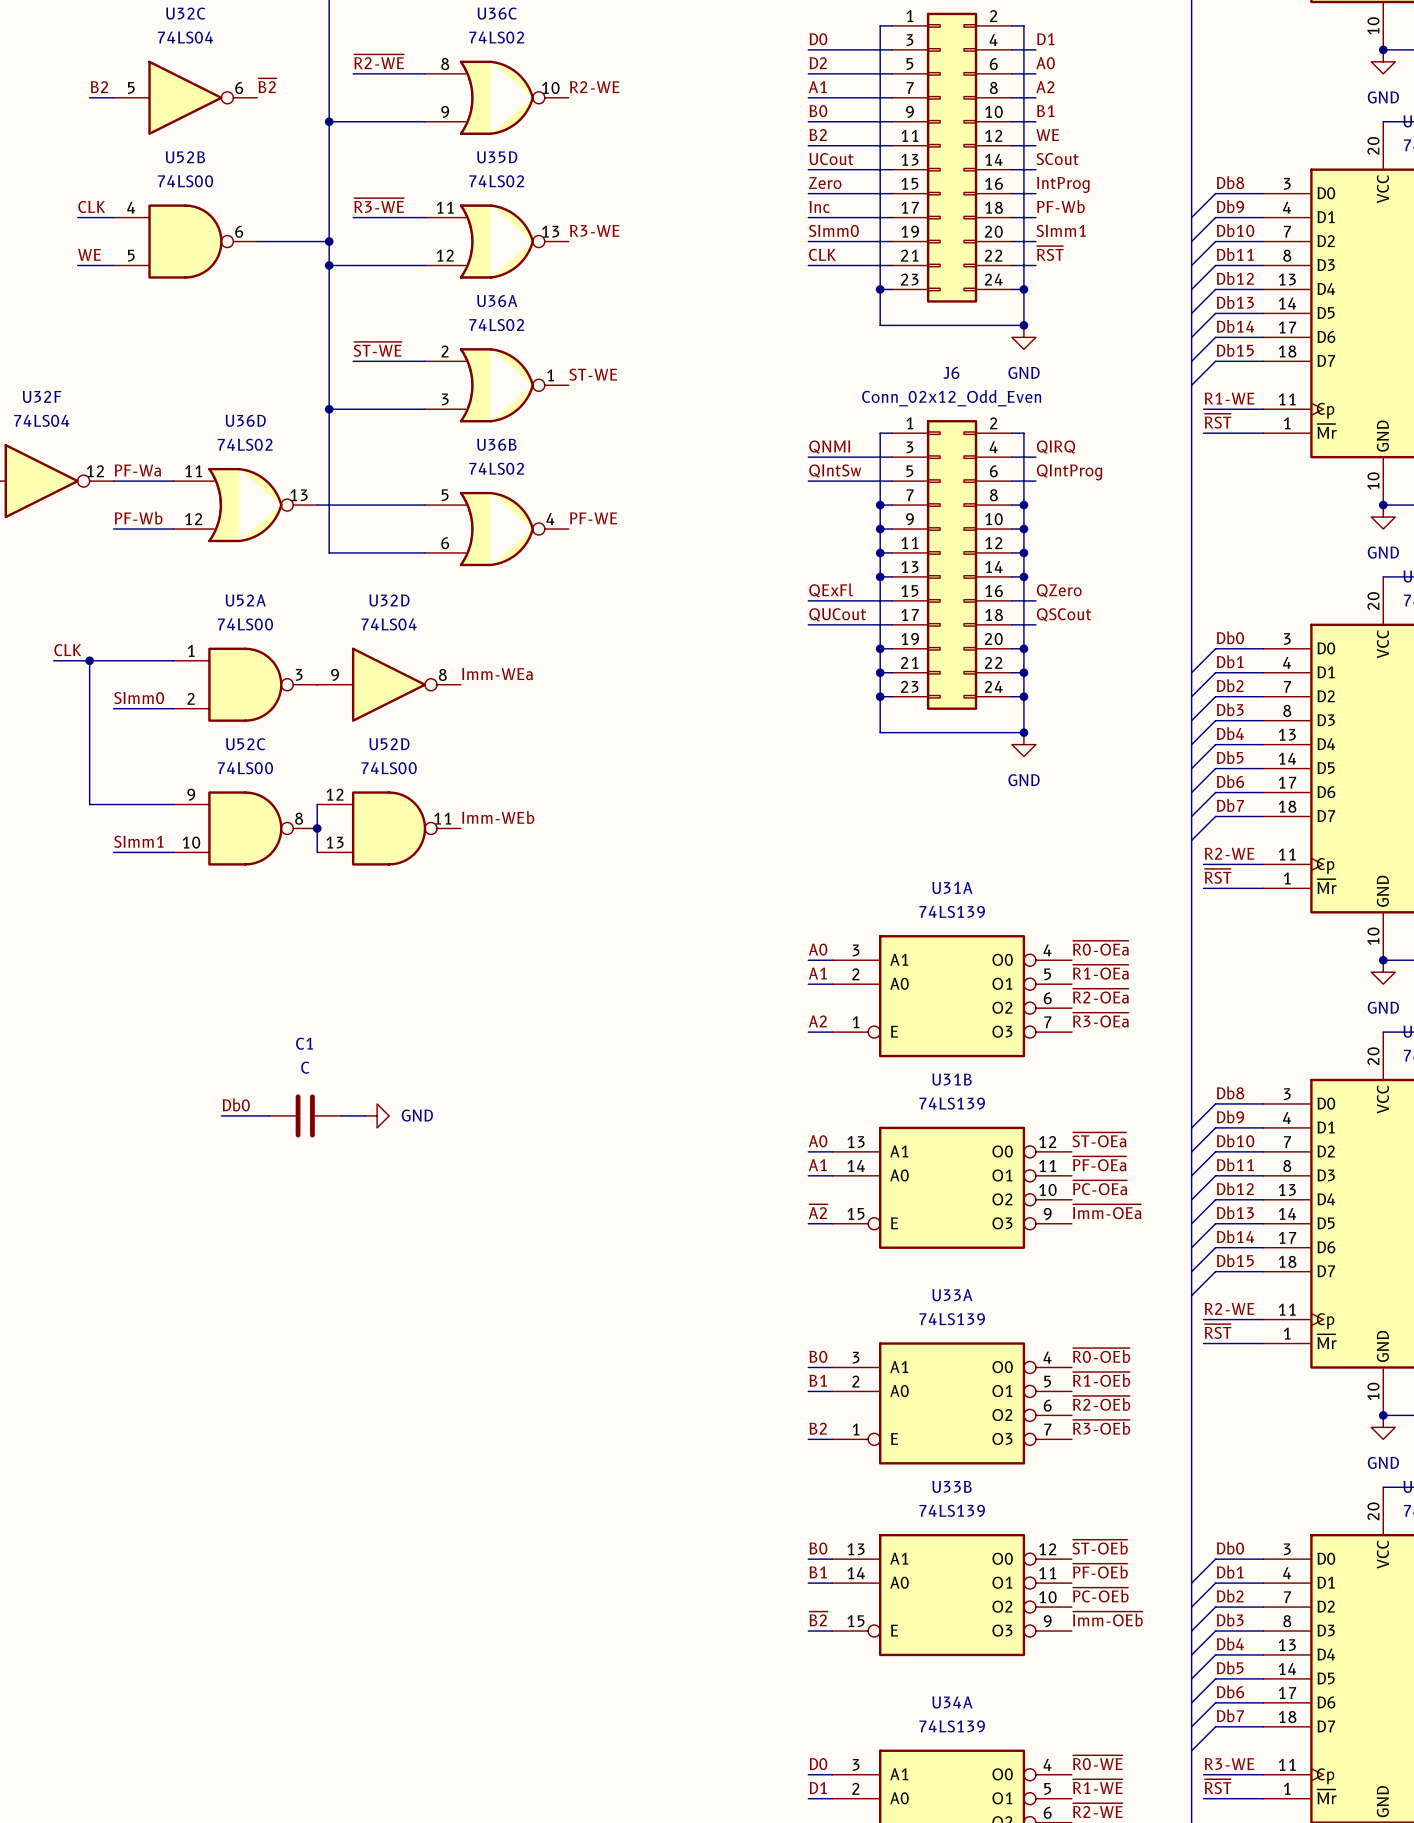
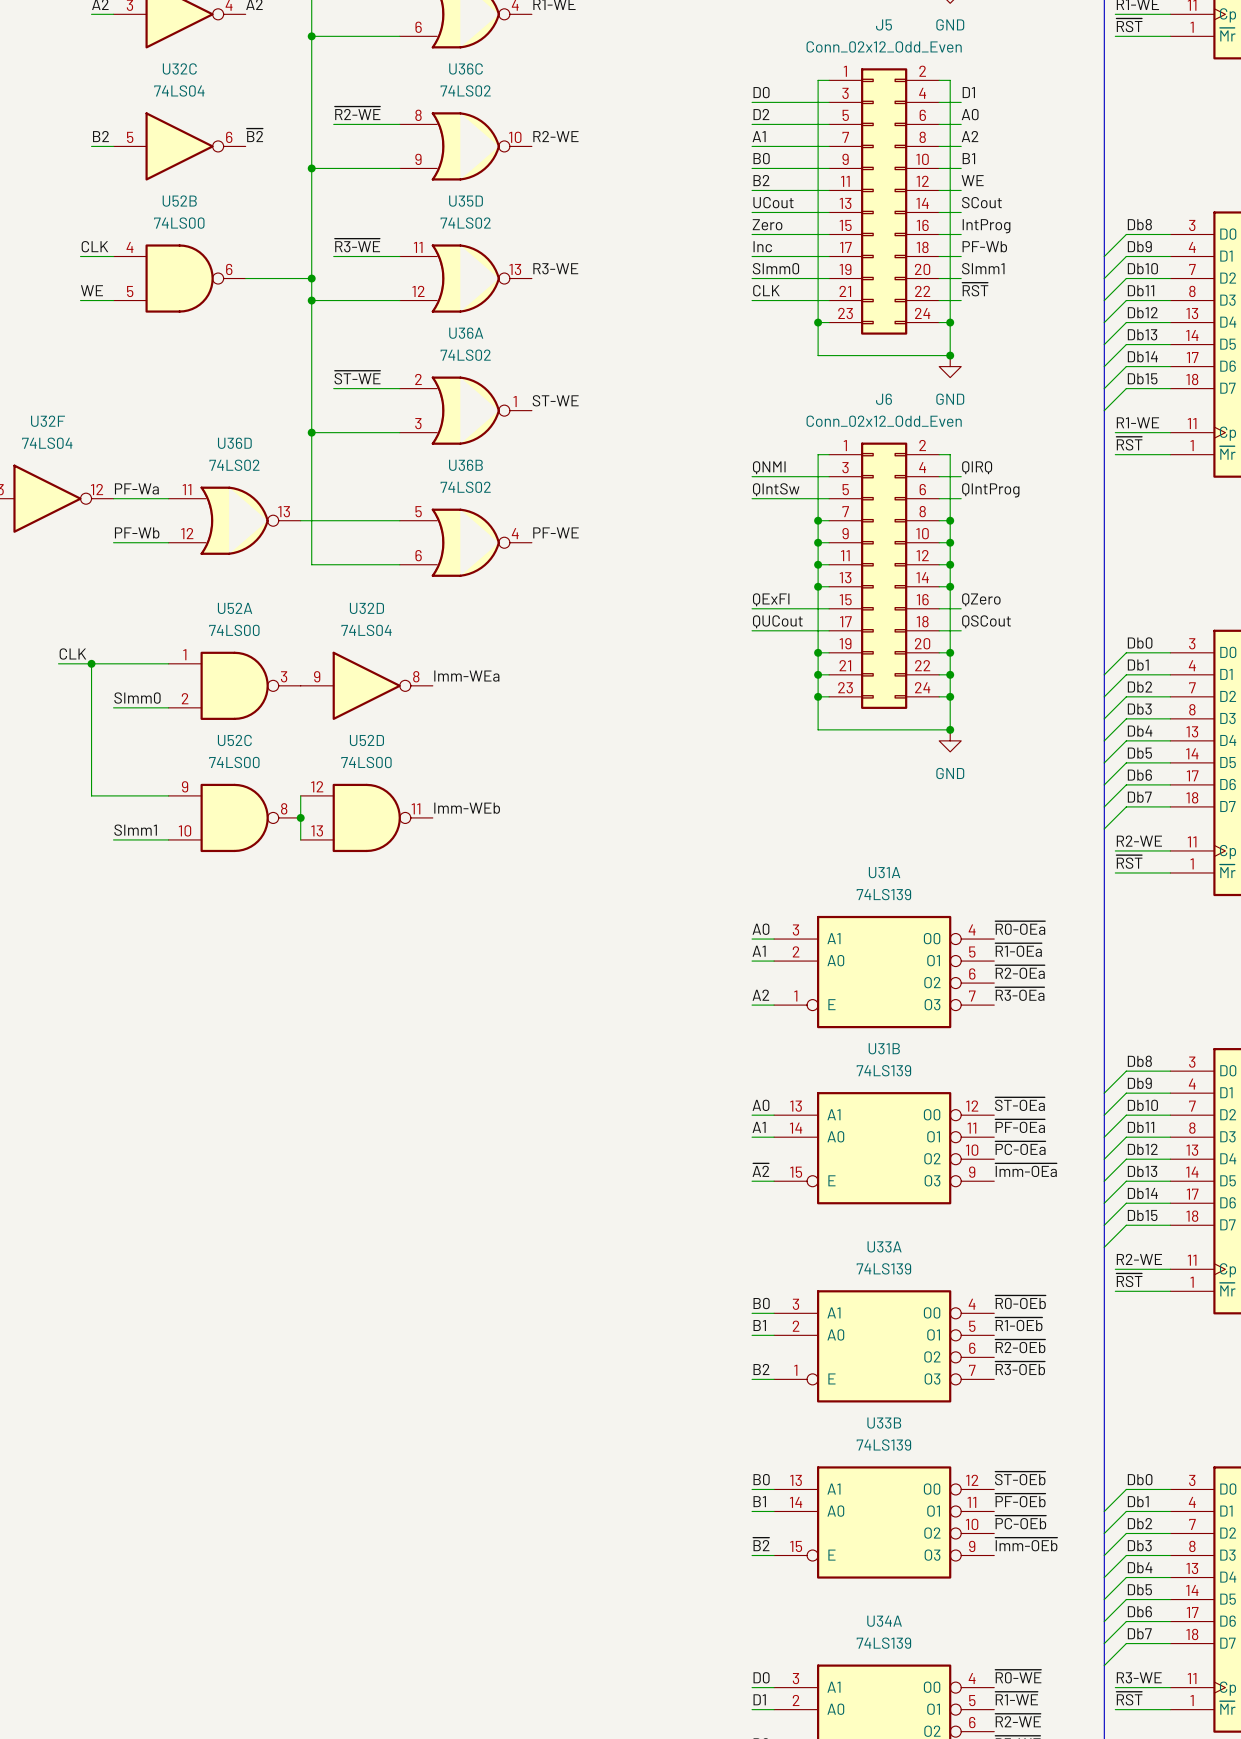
label: Db0 (236, 1104) -> none
wire: (221, 1115) (269, 1115) -> none
C1: C (305, 1115) -> none
wire: (341, 1115) (365, 1115) -> none
power symbol: GND (377, 1115) -> none

